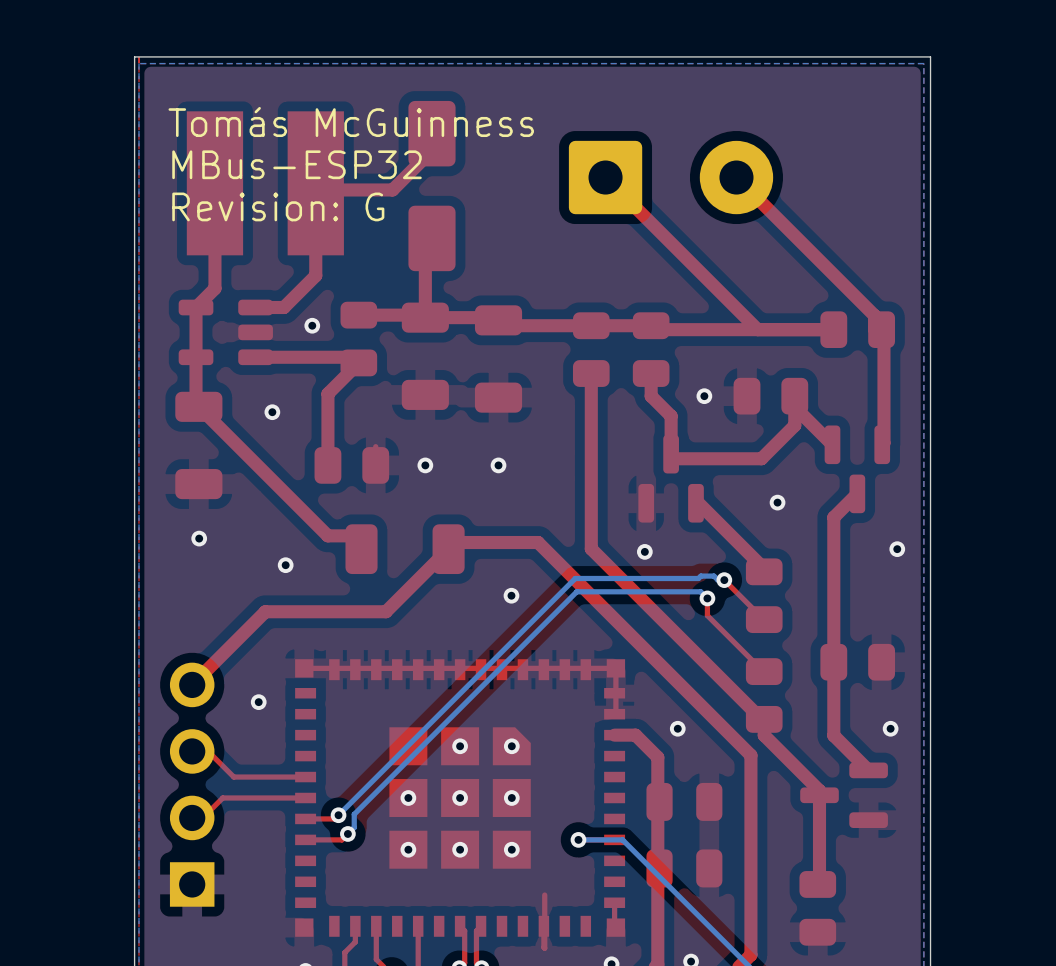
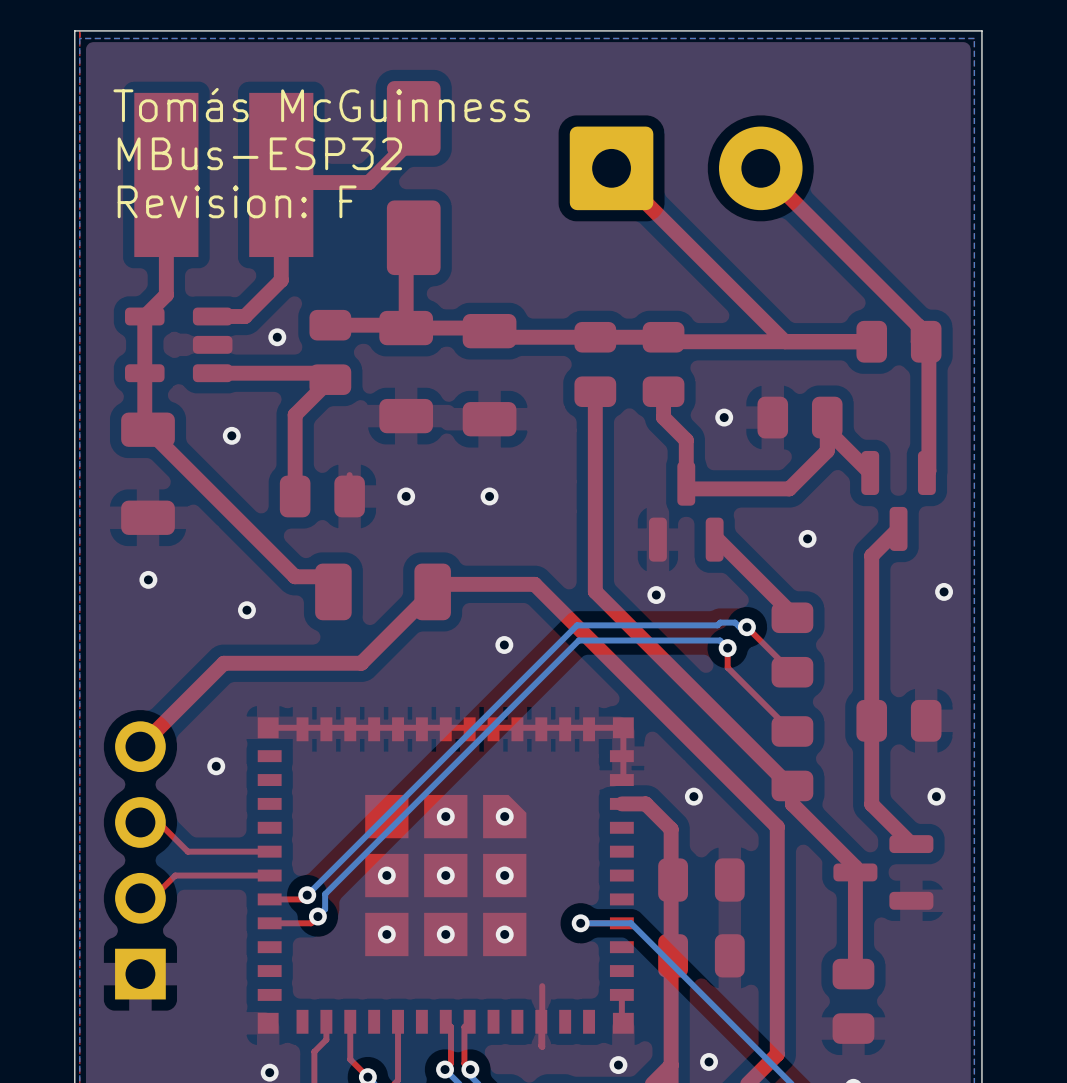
text: Revision: G (278, 206) -> Revision: F (237, 201)

